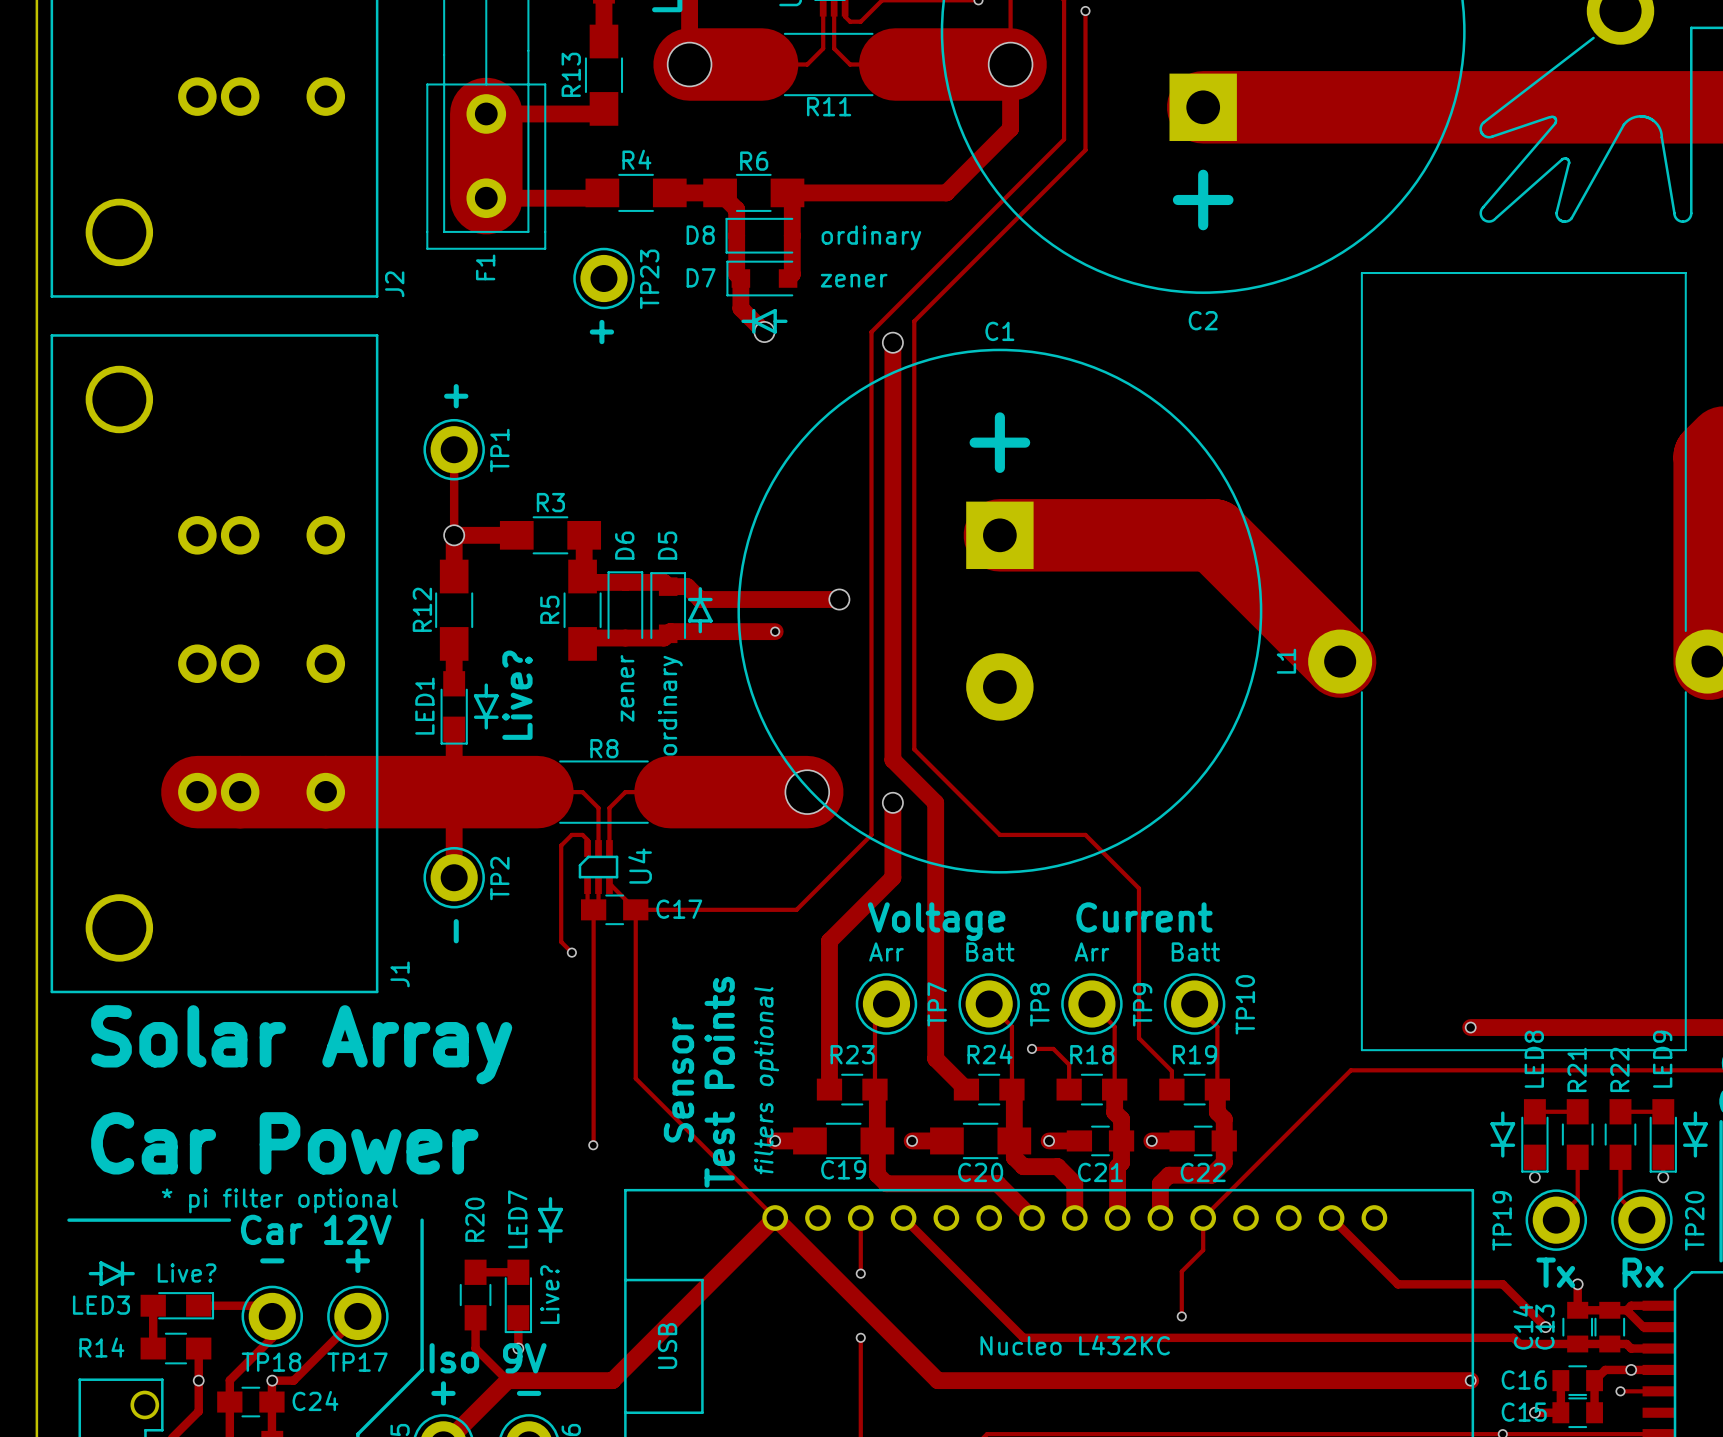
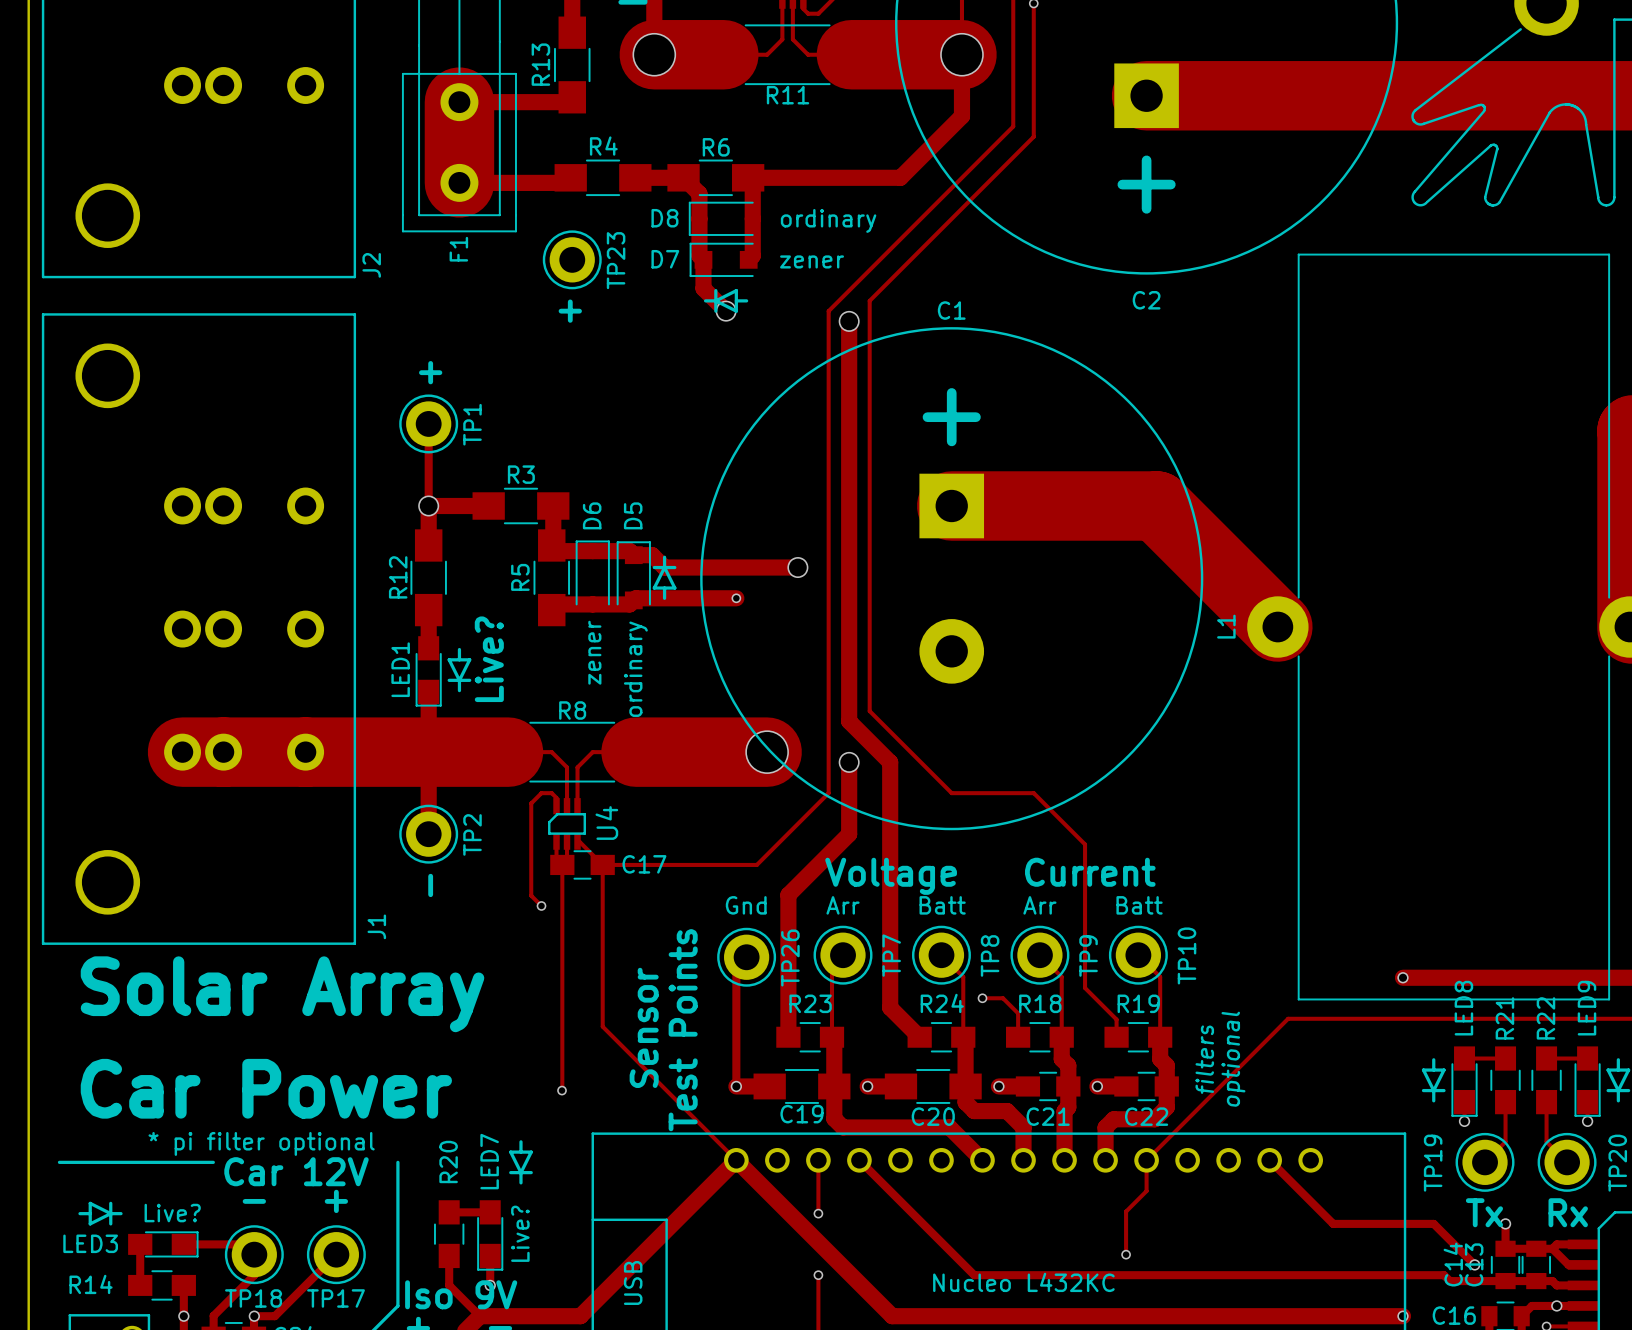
text: none -> Gnd (746, 905)
track: none -> (746, 957) (736, 967) (736, 1086)
TP26: none -> (746, 957)
text: filters optional (766, 1080) -> none
text: none -> filters (1204, 1059)
text: none -> optional (1233, 1059)

